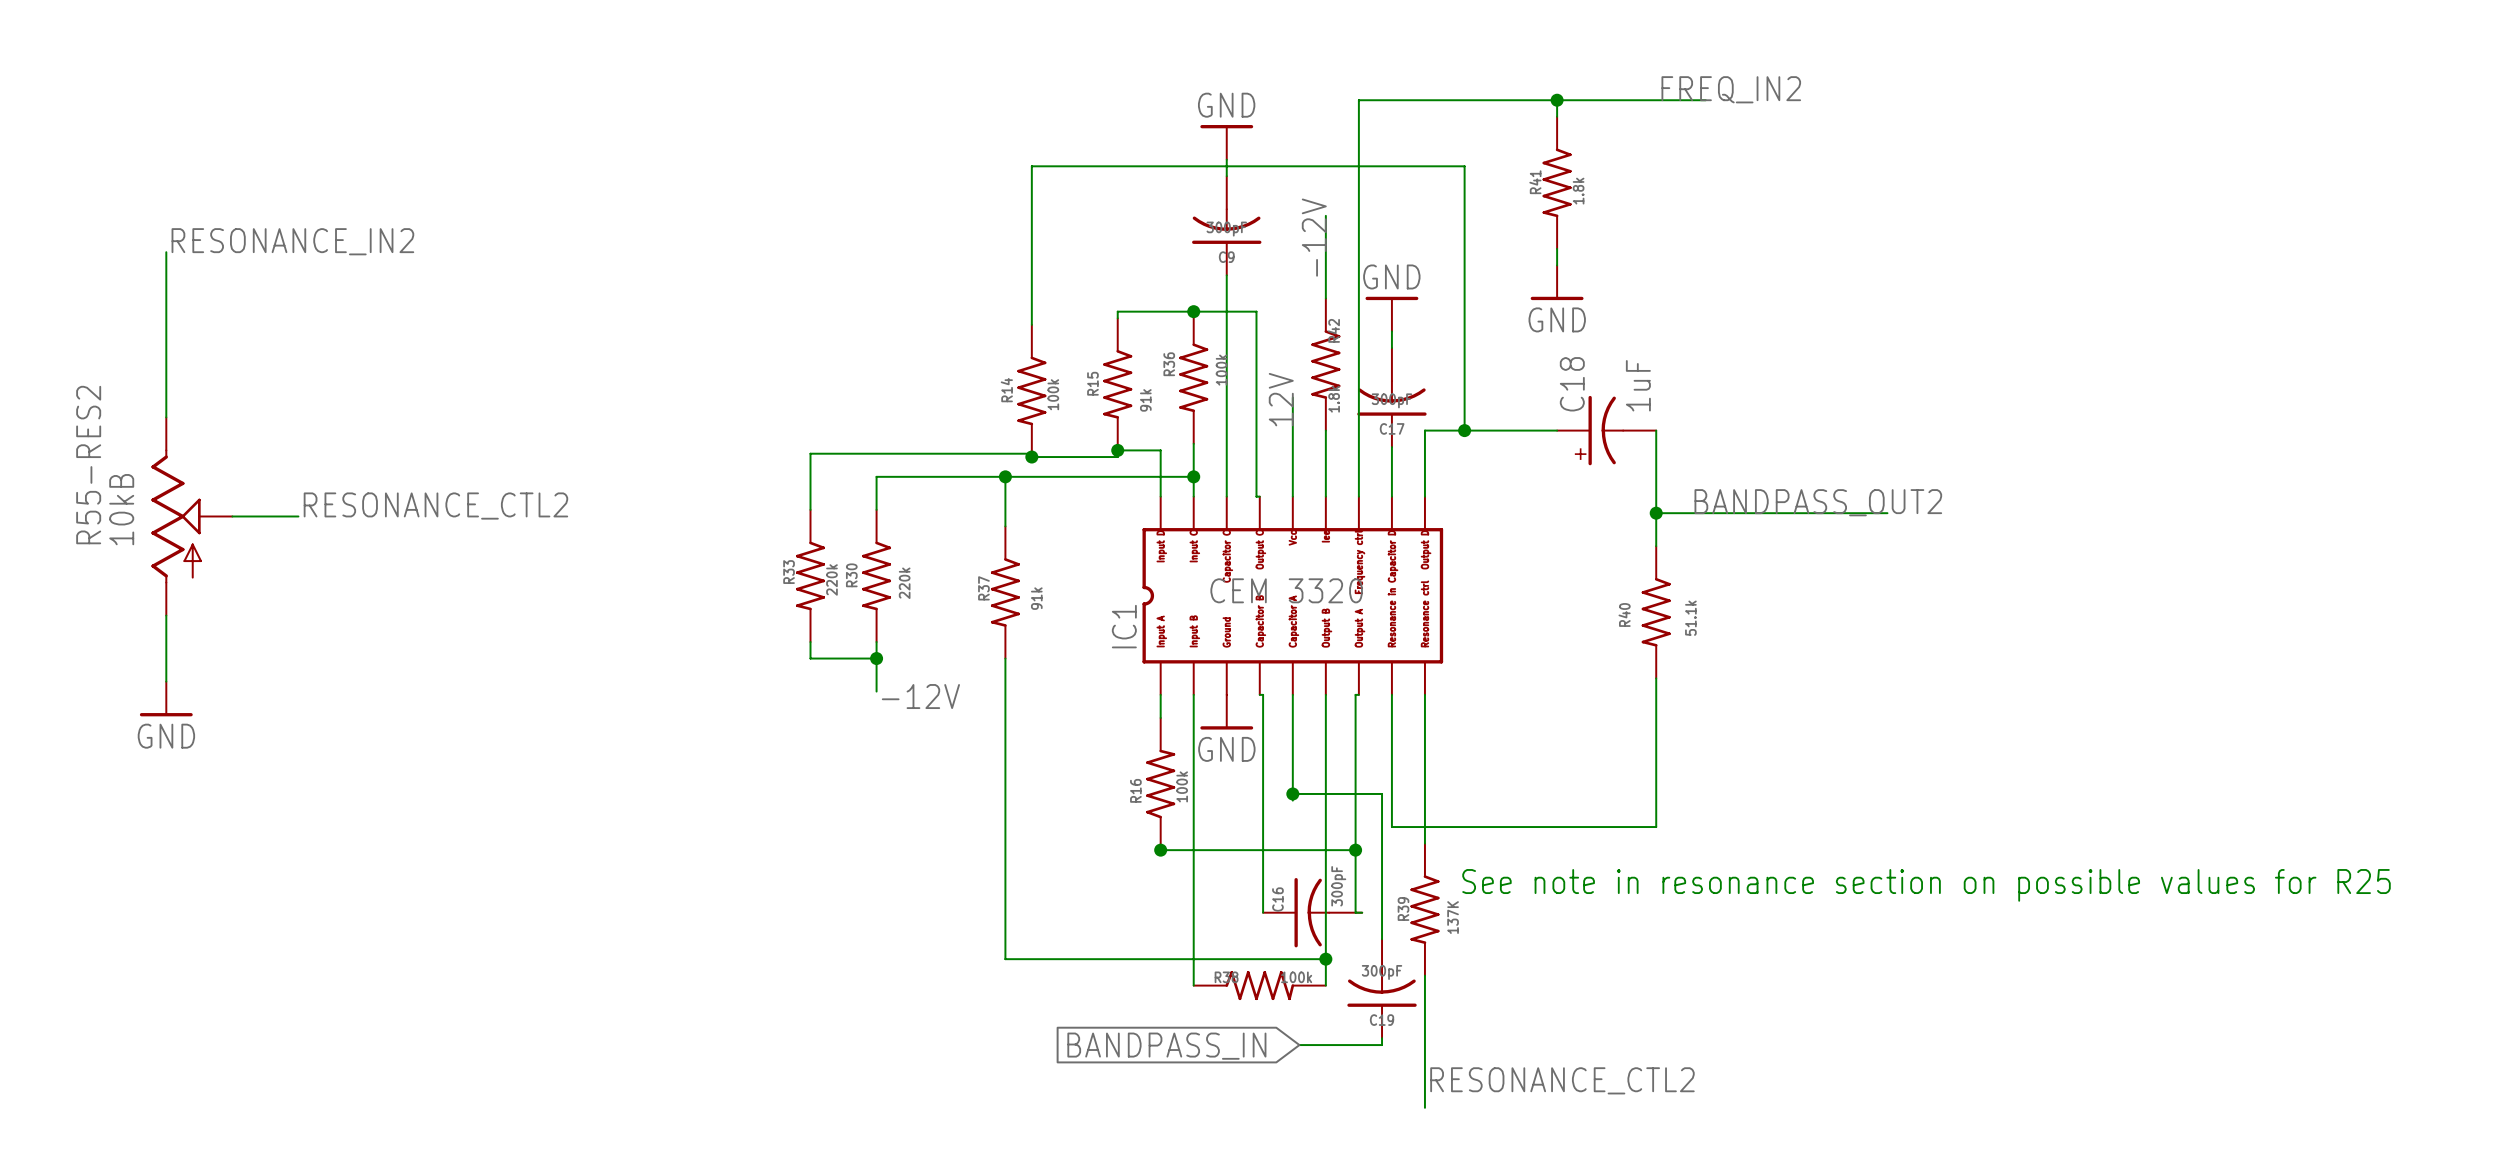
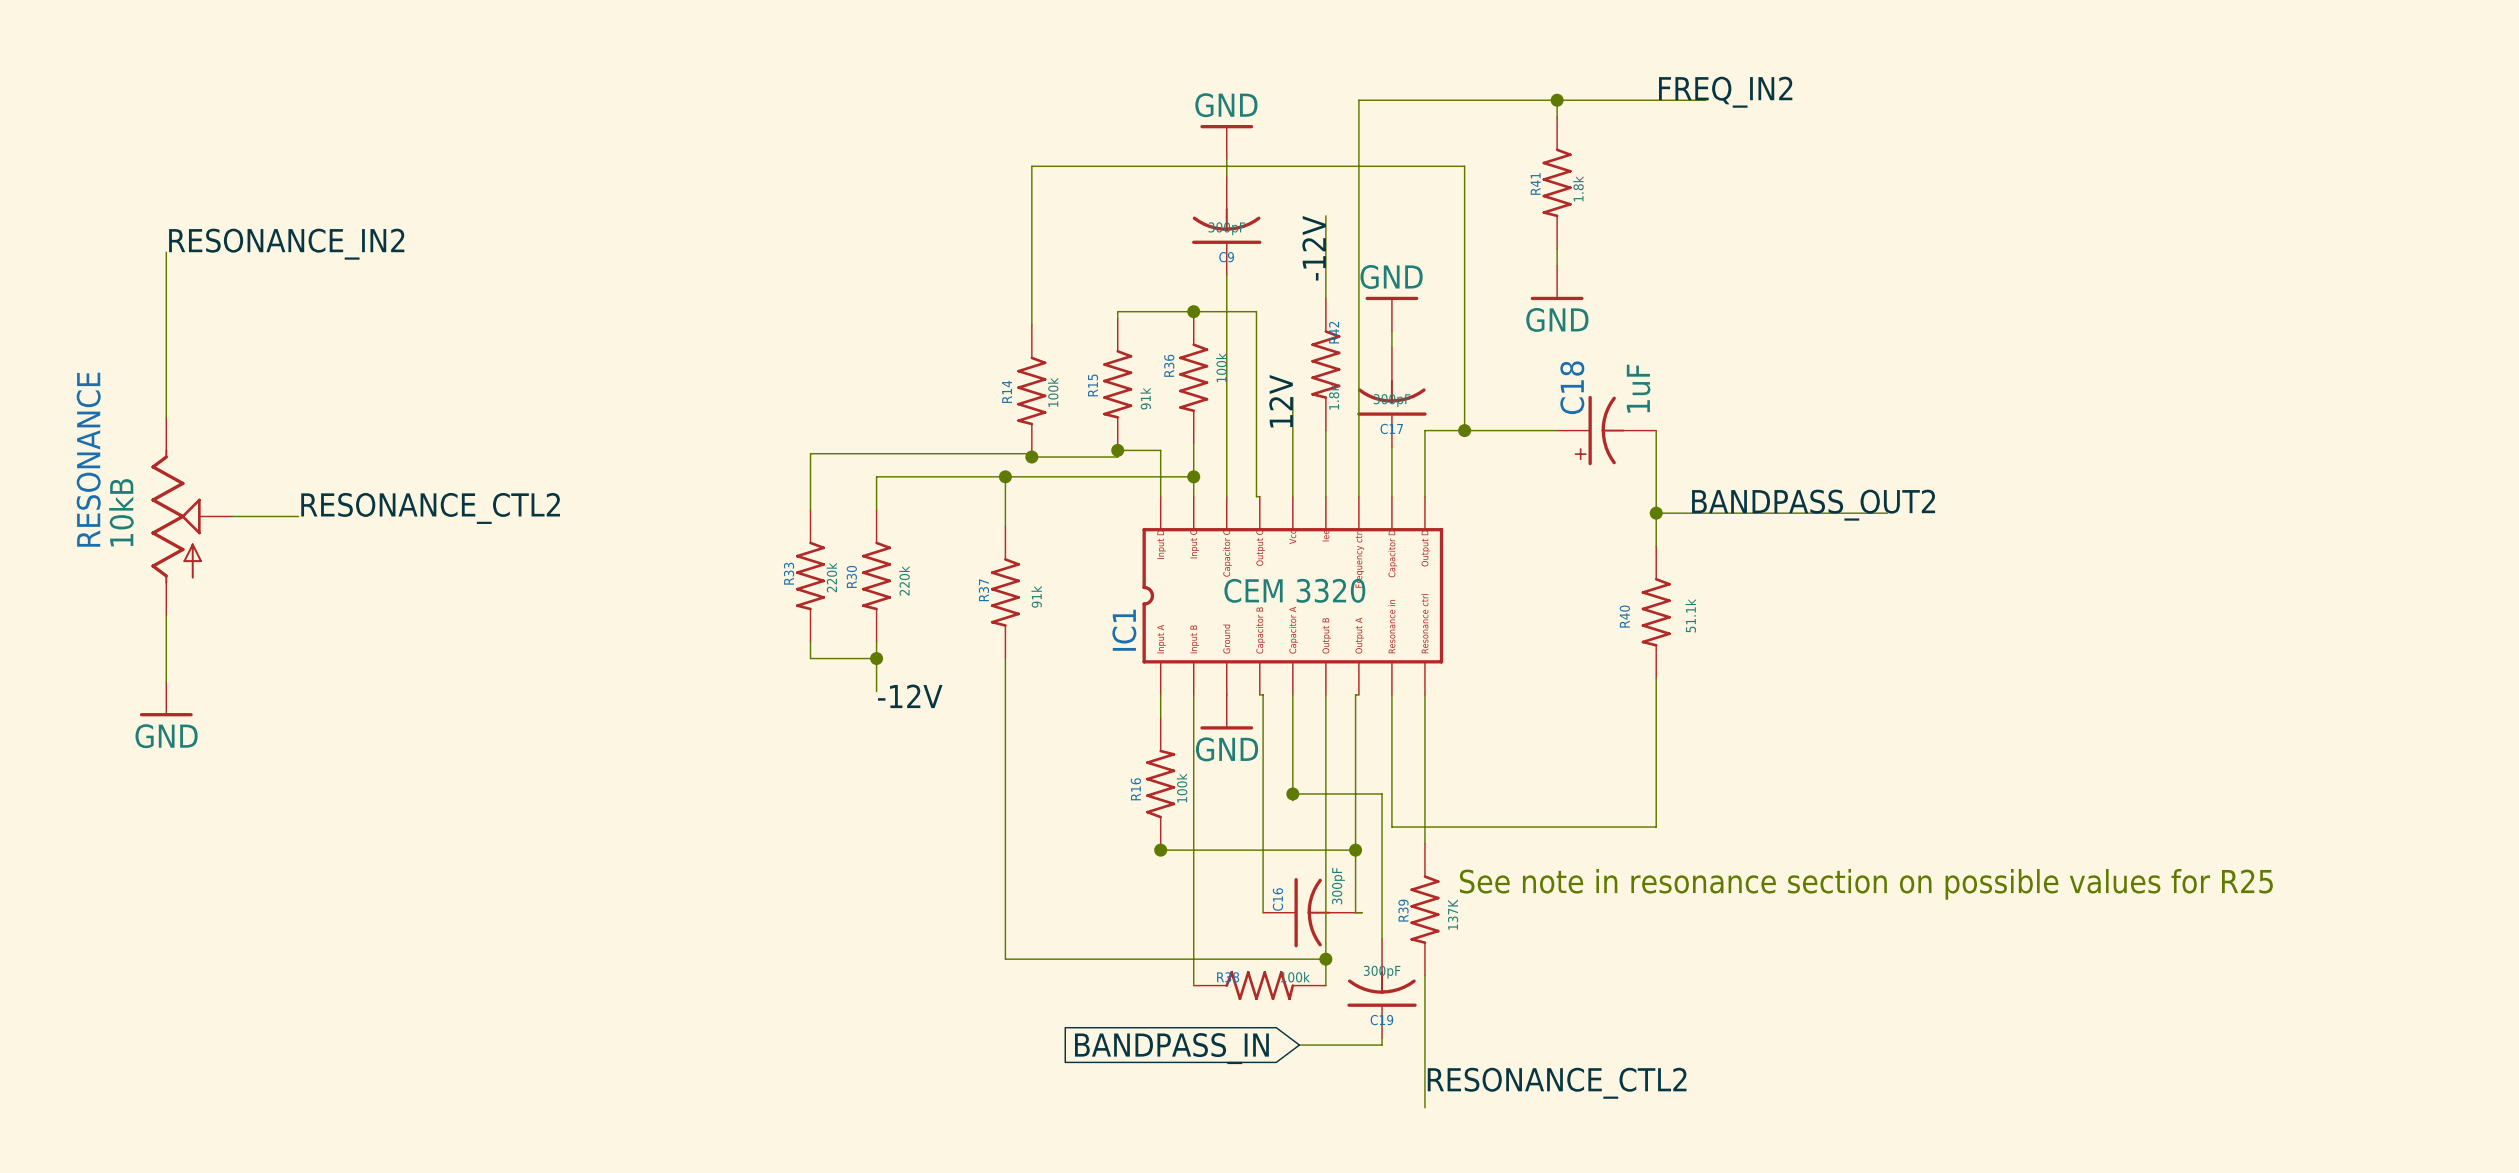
R55-RES2 name: R55-RES2 (88, 465) -> RESONANCE (88, 459)

